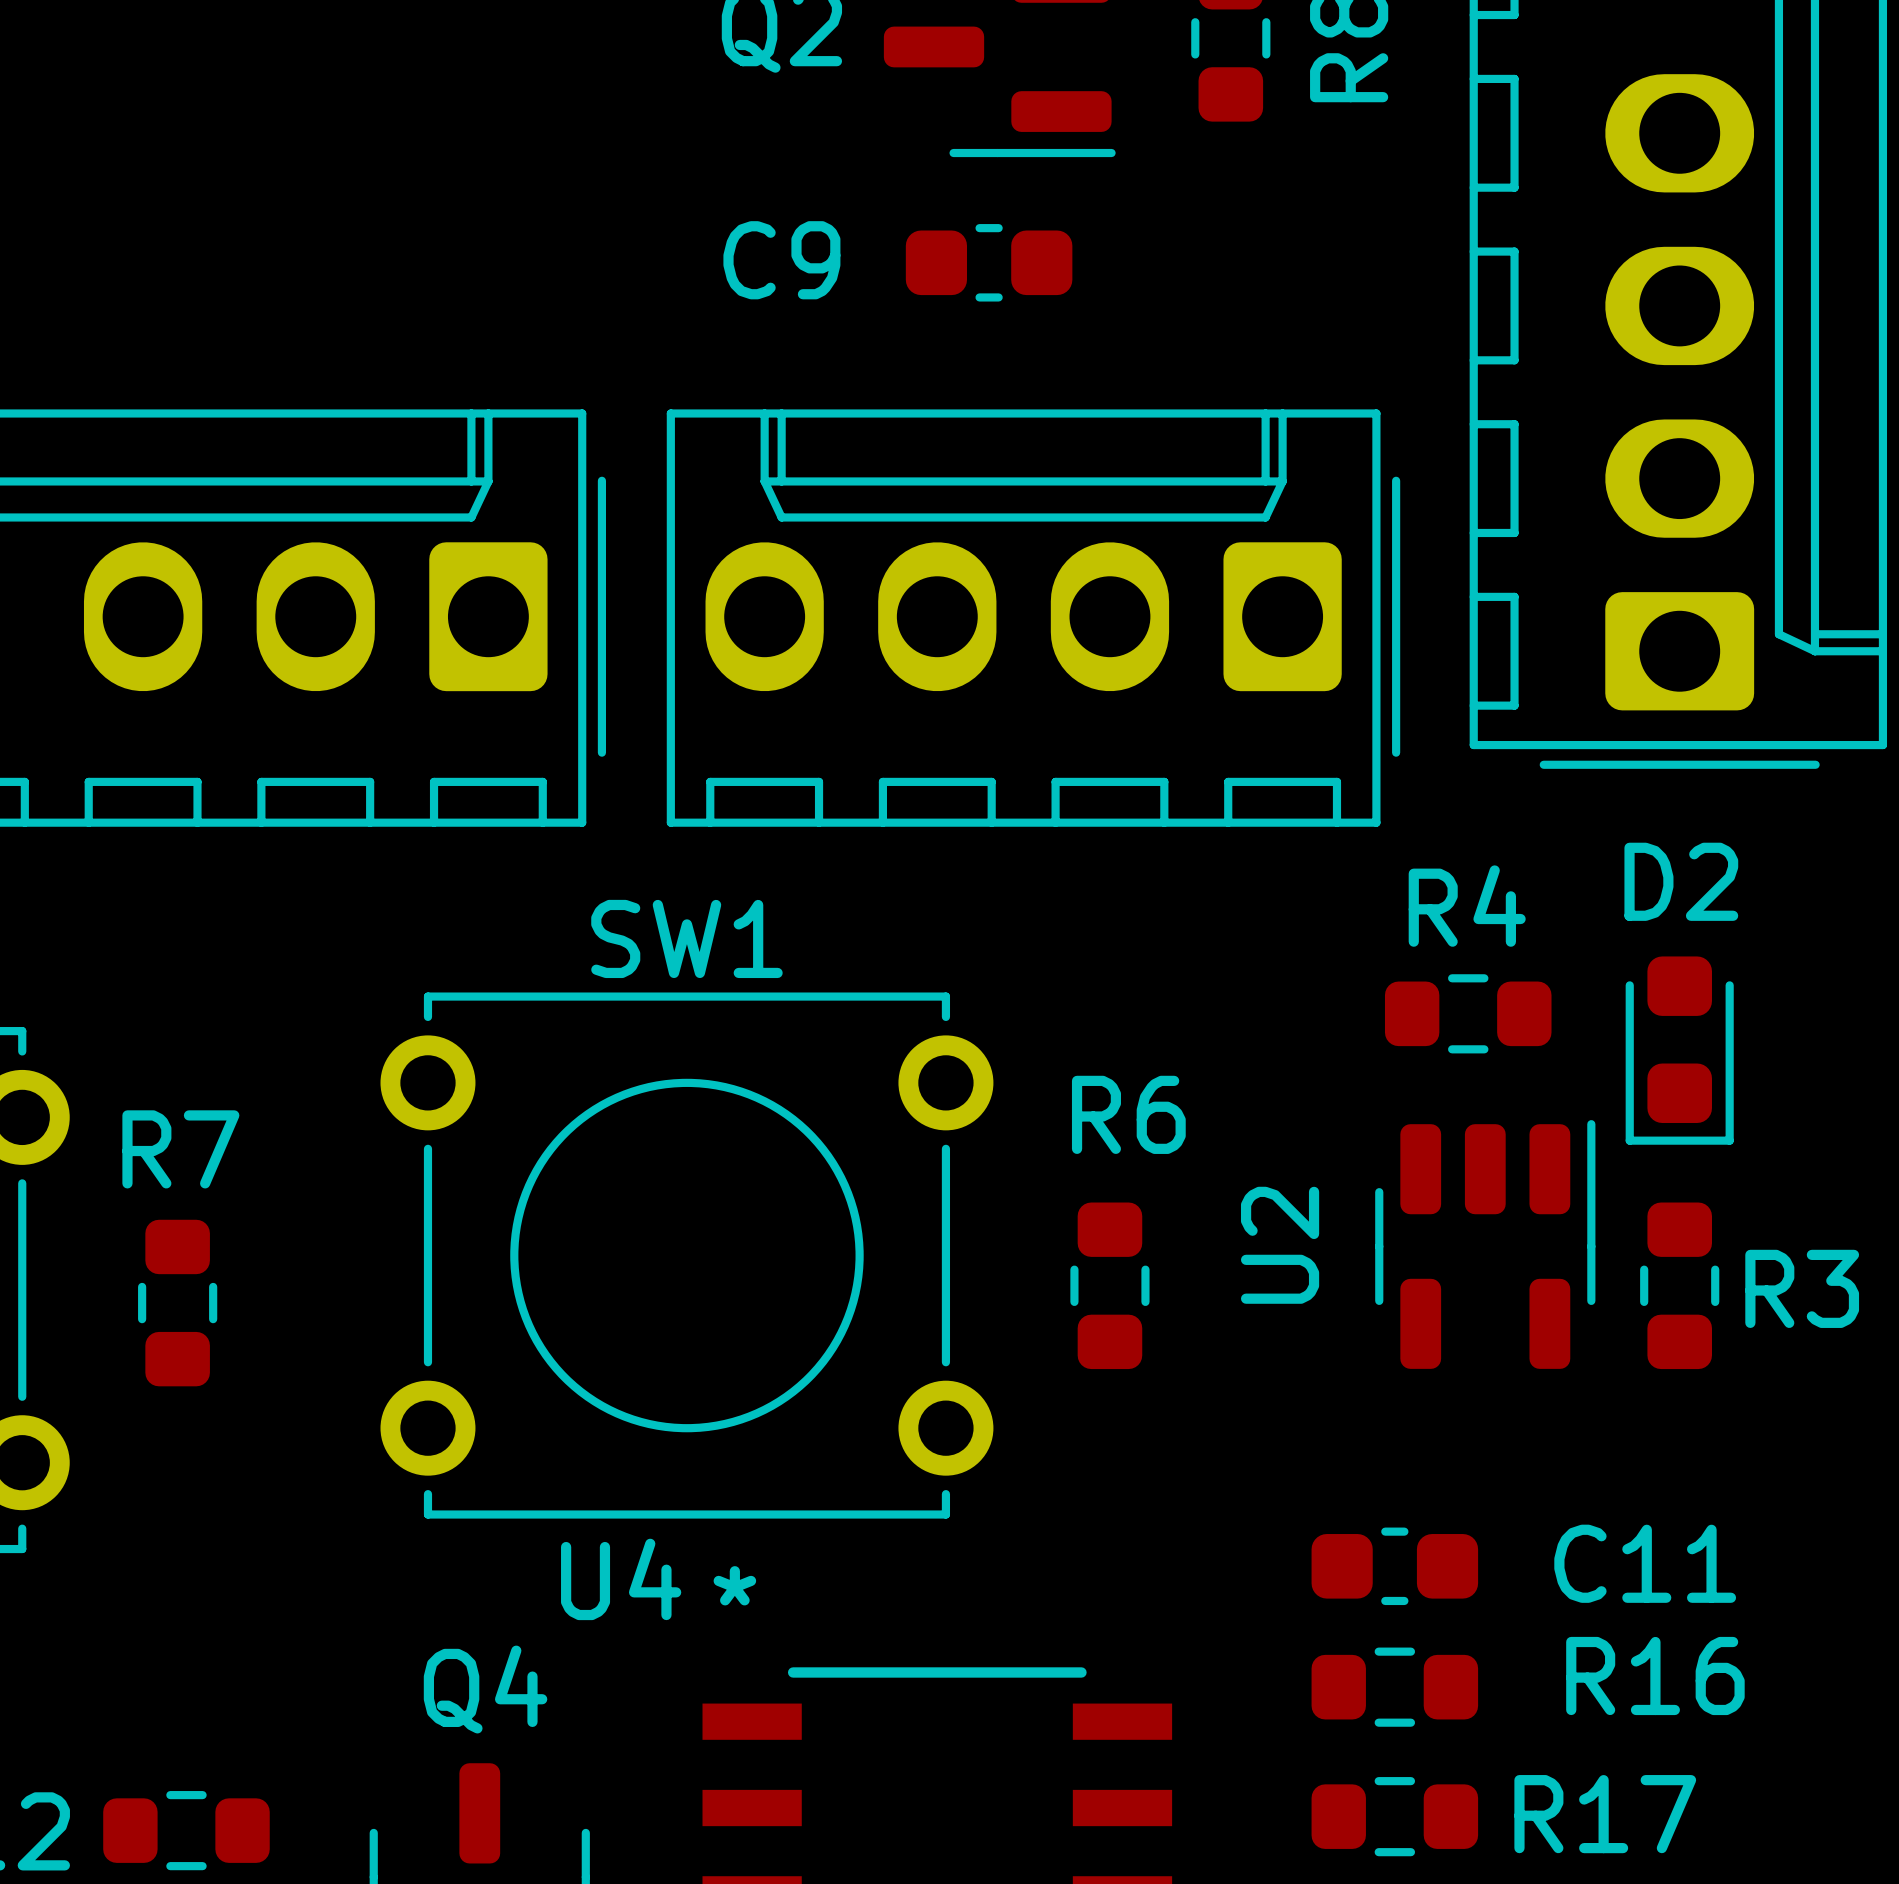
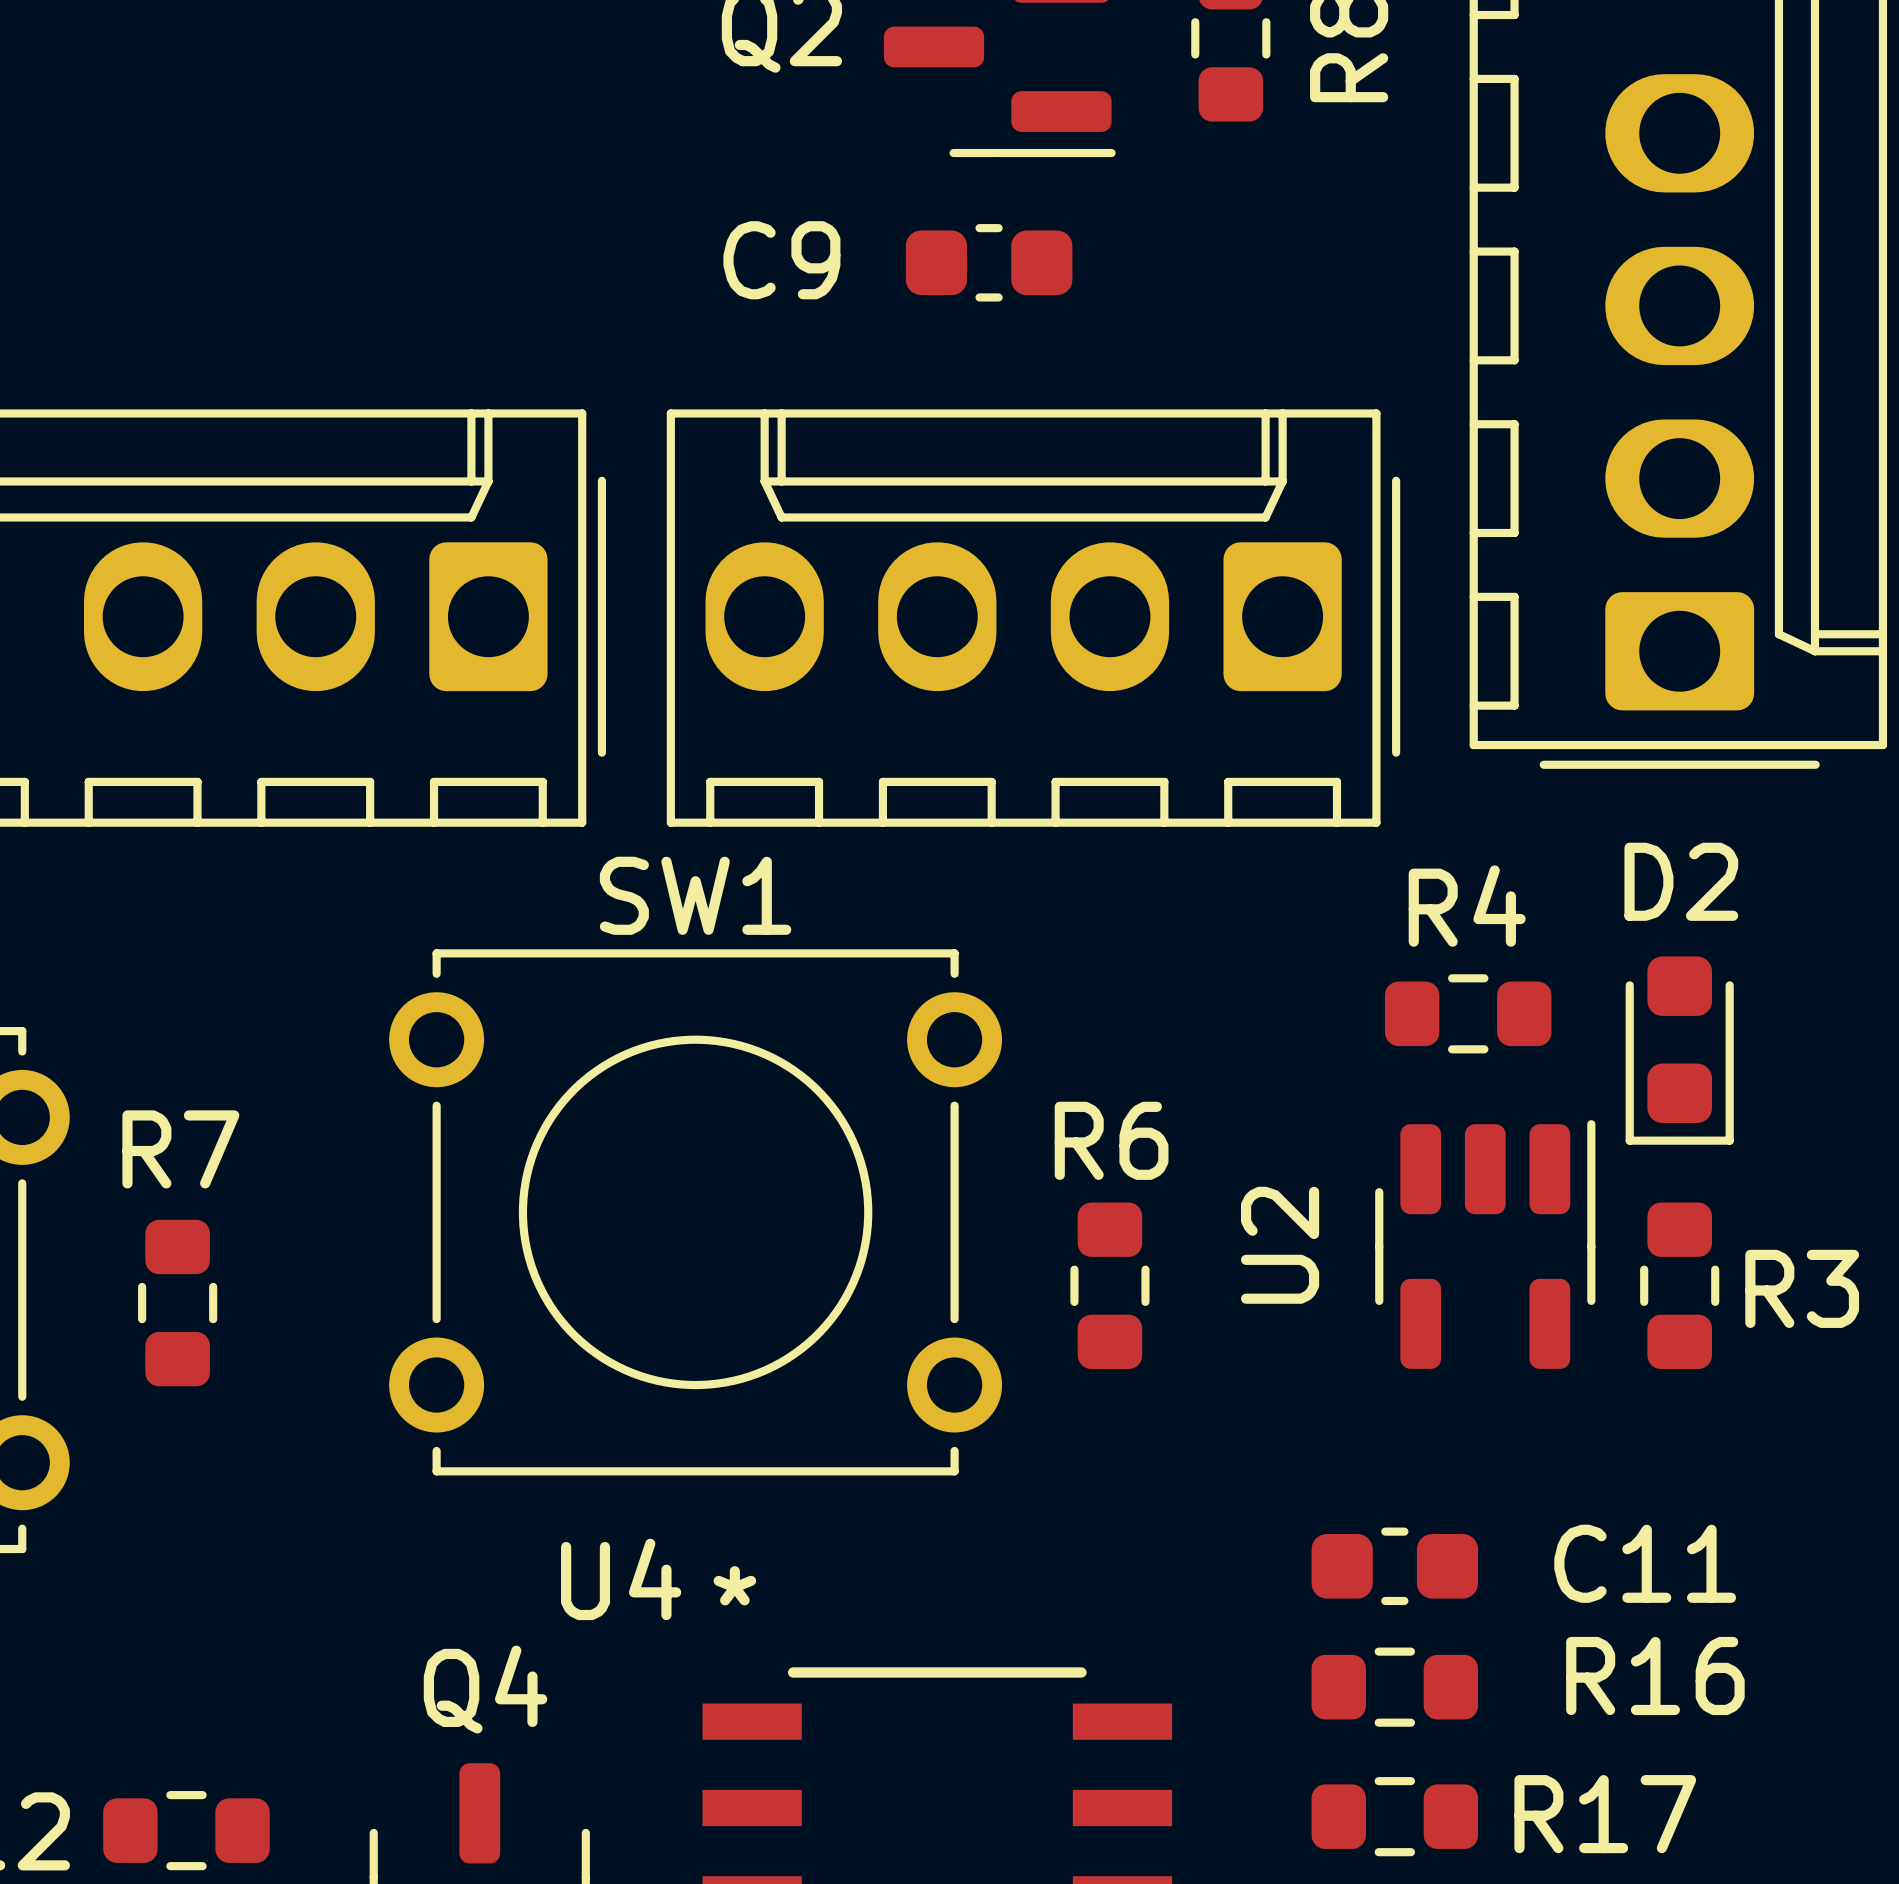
R6 name position: R6 (1128, 1114) -> R6 (1111, 1140)
SW1 position: (686, 1255) -> (695, 1212)

